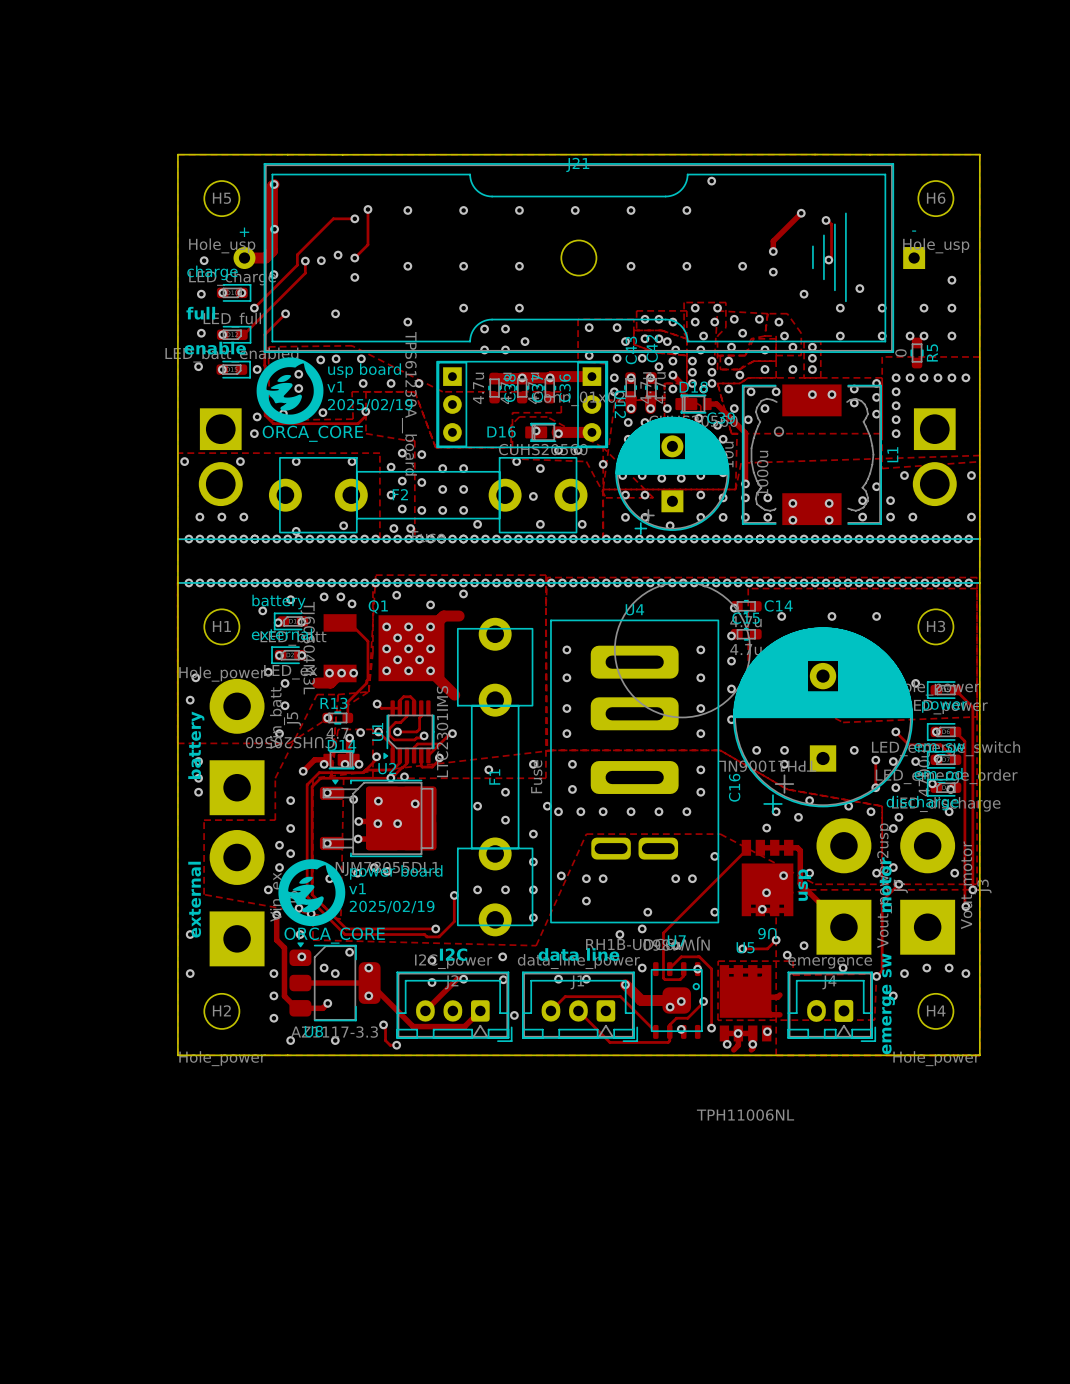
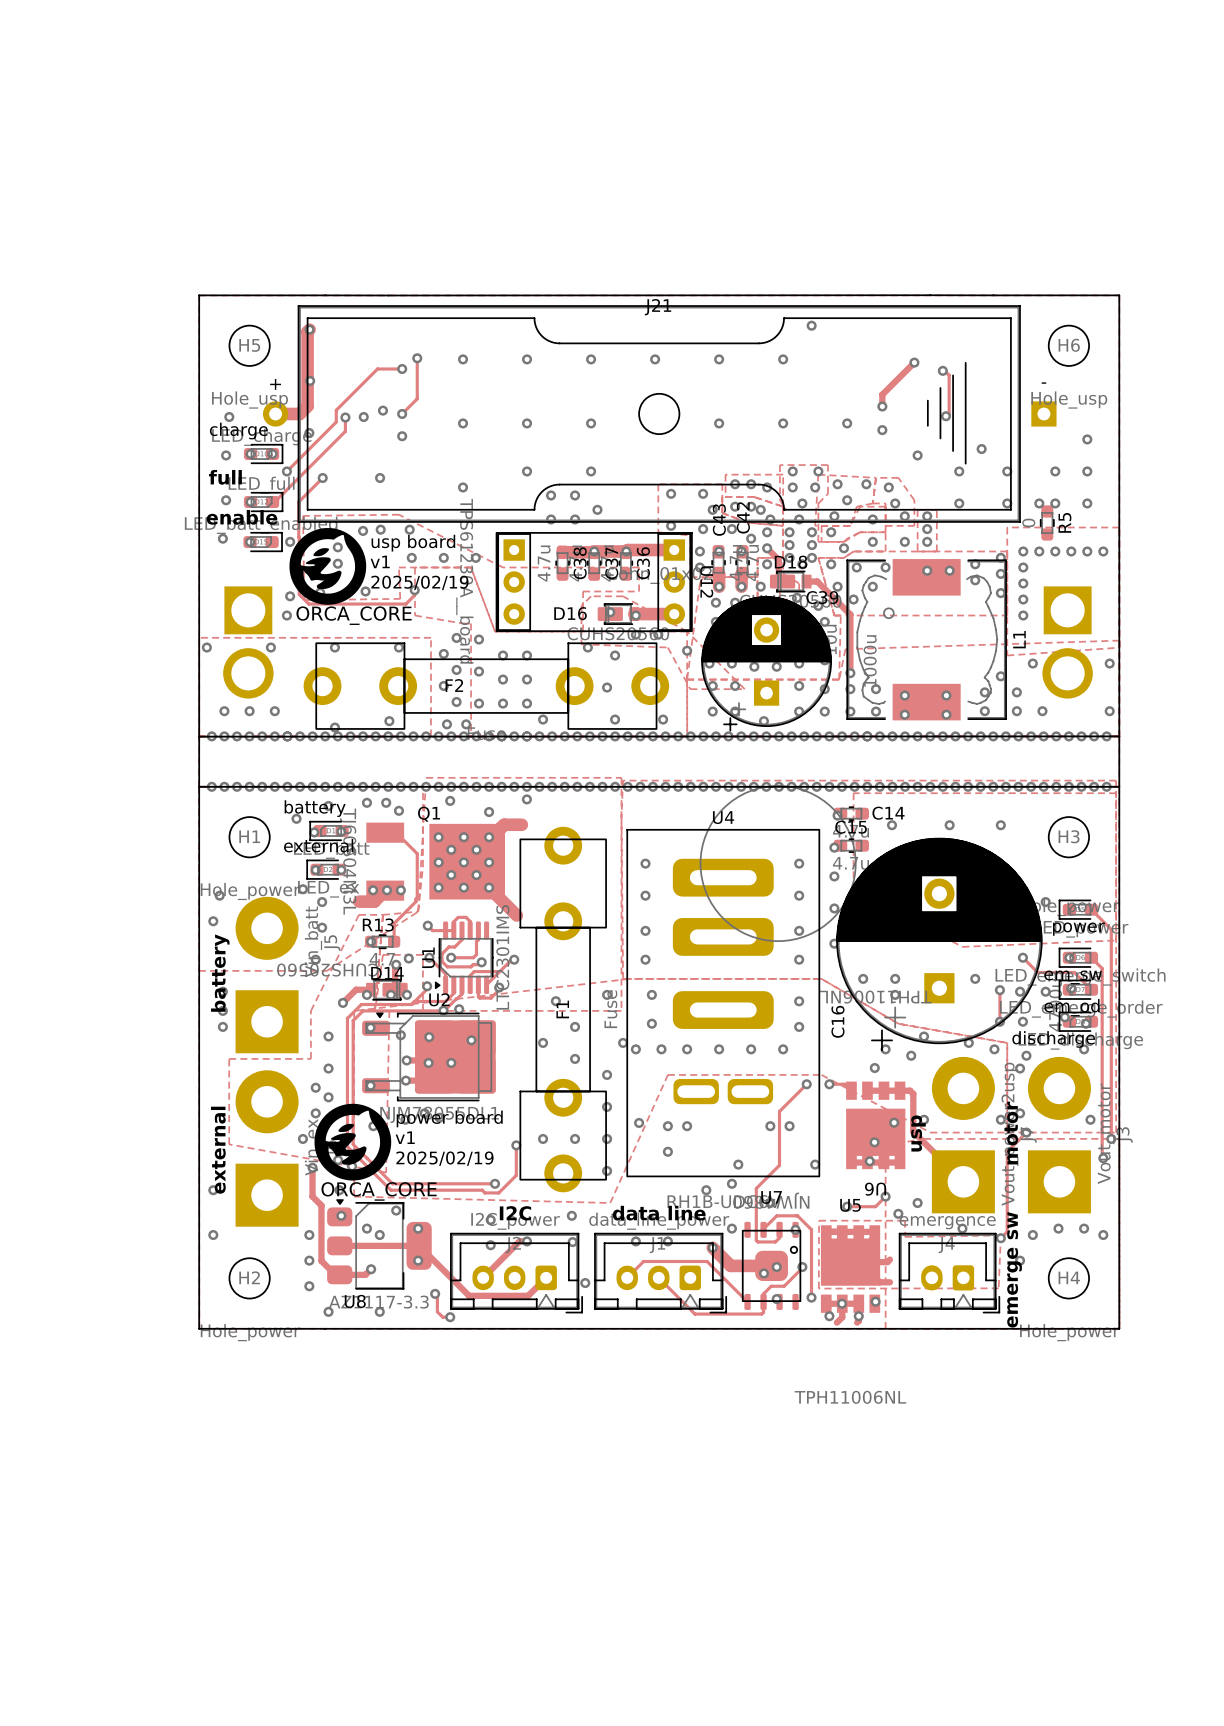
via: none -> (806, 1084)
via: none -> (829, 1084)
track: none -> (831, 1084) (845, 1084) (851, 1090)
track: (745, 850) (683, 912) -> (806, 1084) (779, 1111) (779, 1165)
via: (714, 856) -> none

